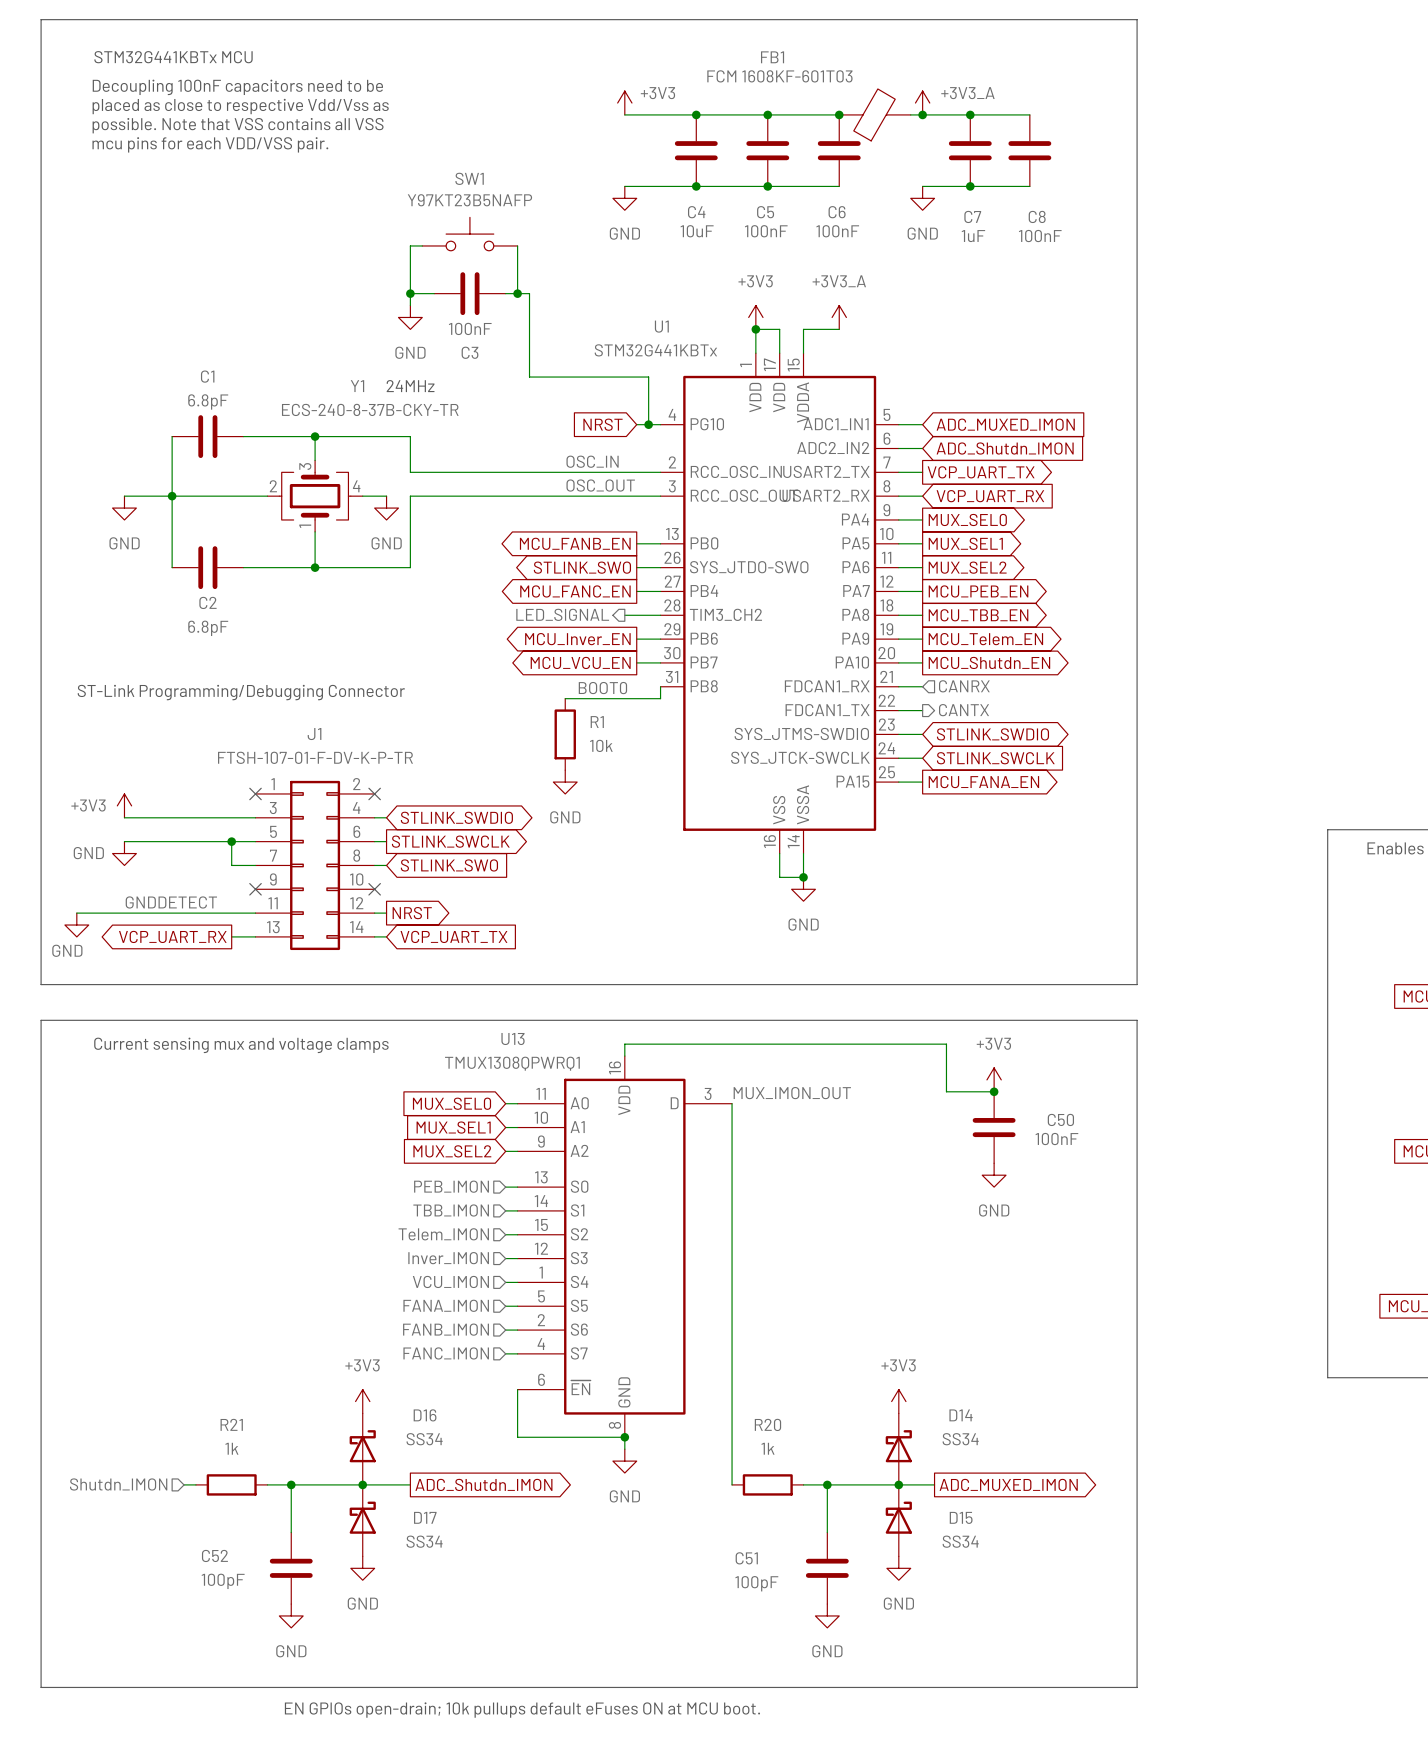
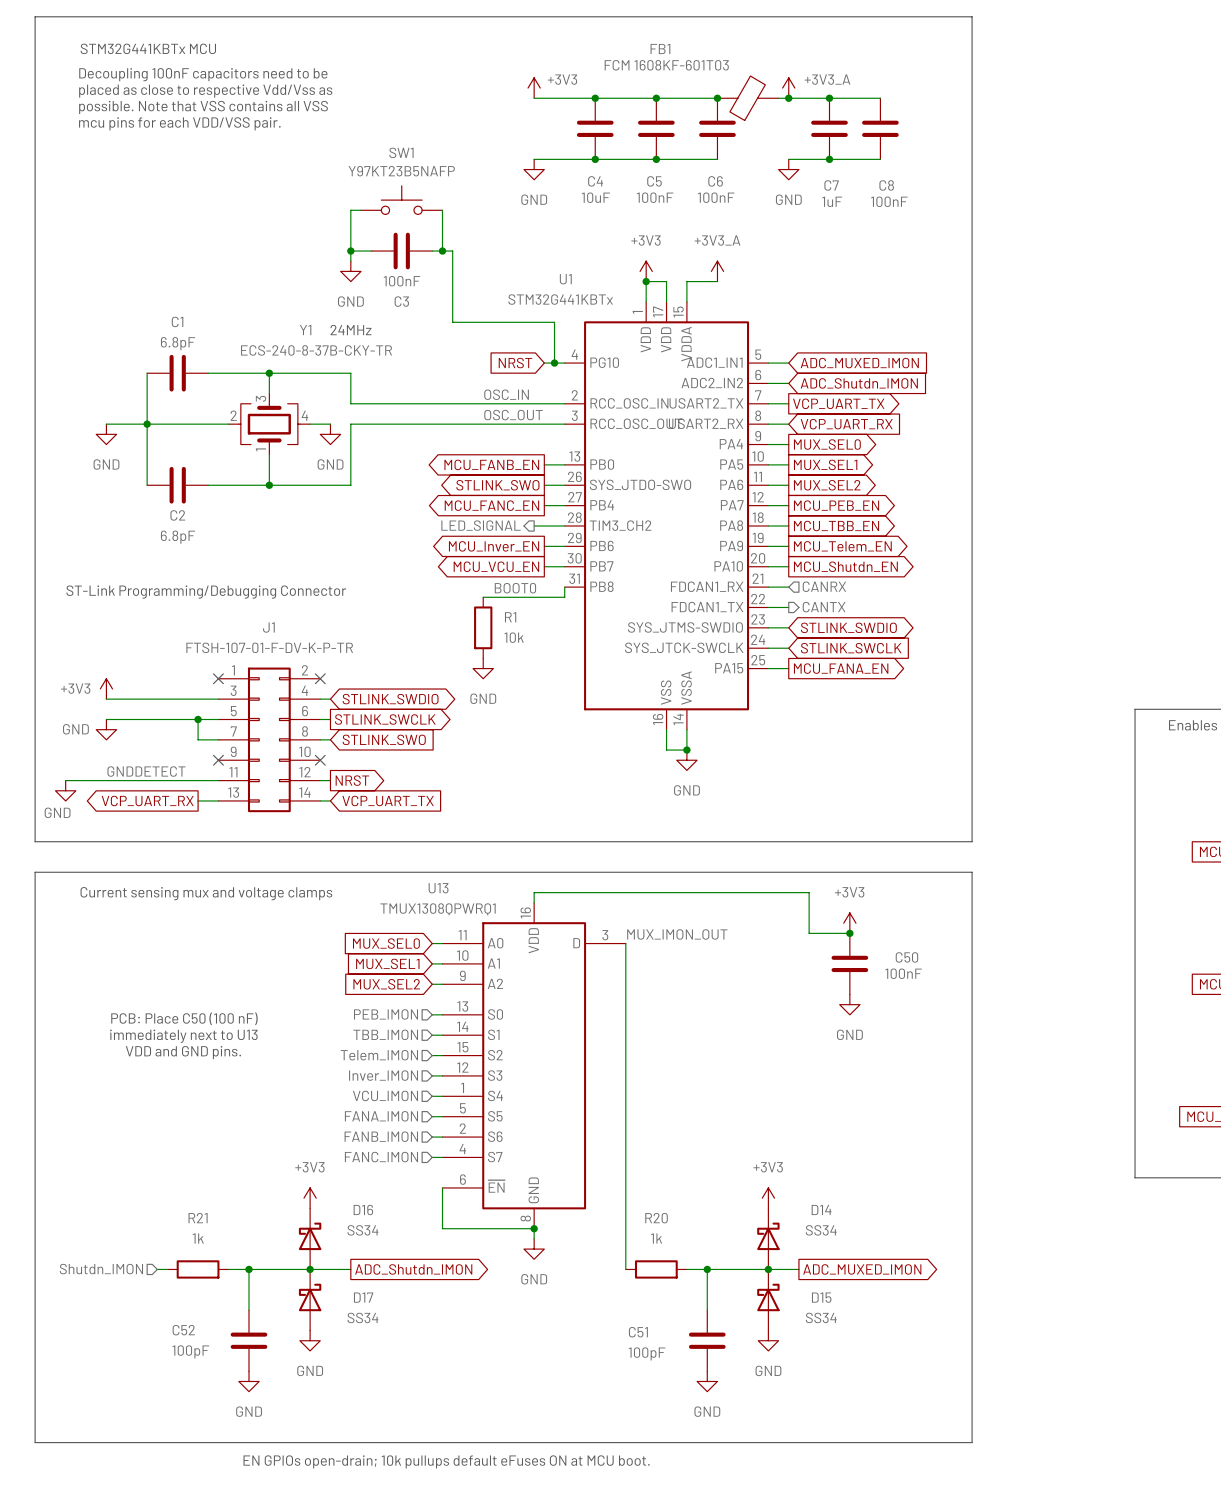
text: none -> PCB: Place C50 (100 nF) (184, 1018)
text: none -> immediately next to U13 (183, 1036)
text: none -> VDD and GND pins. (183, 1052)

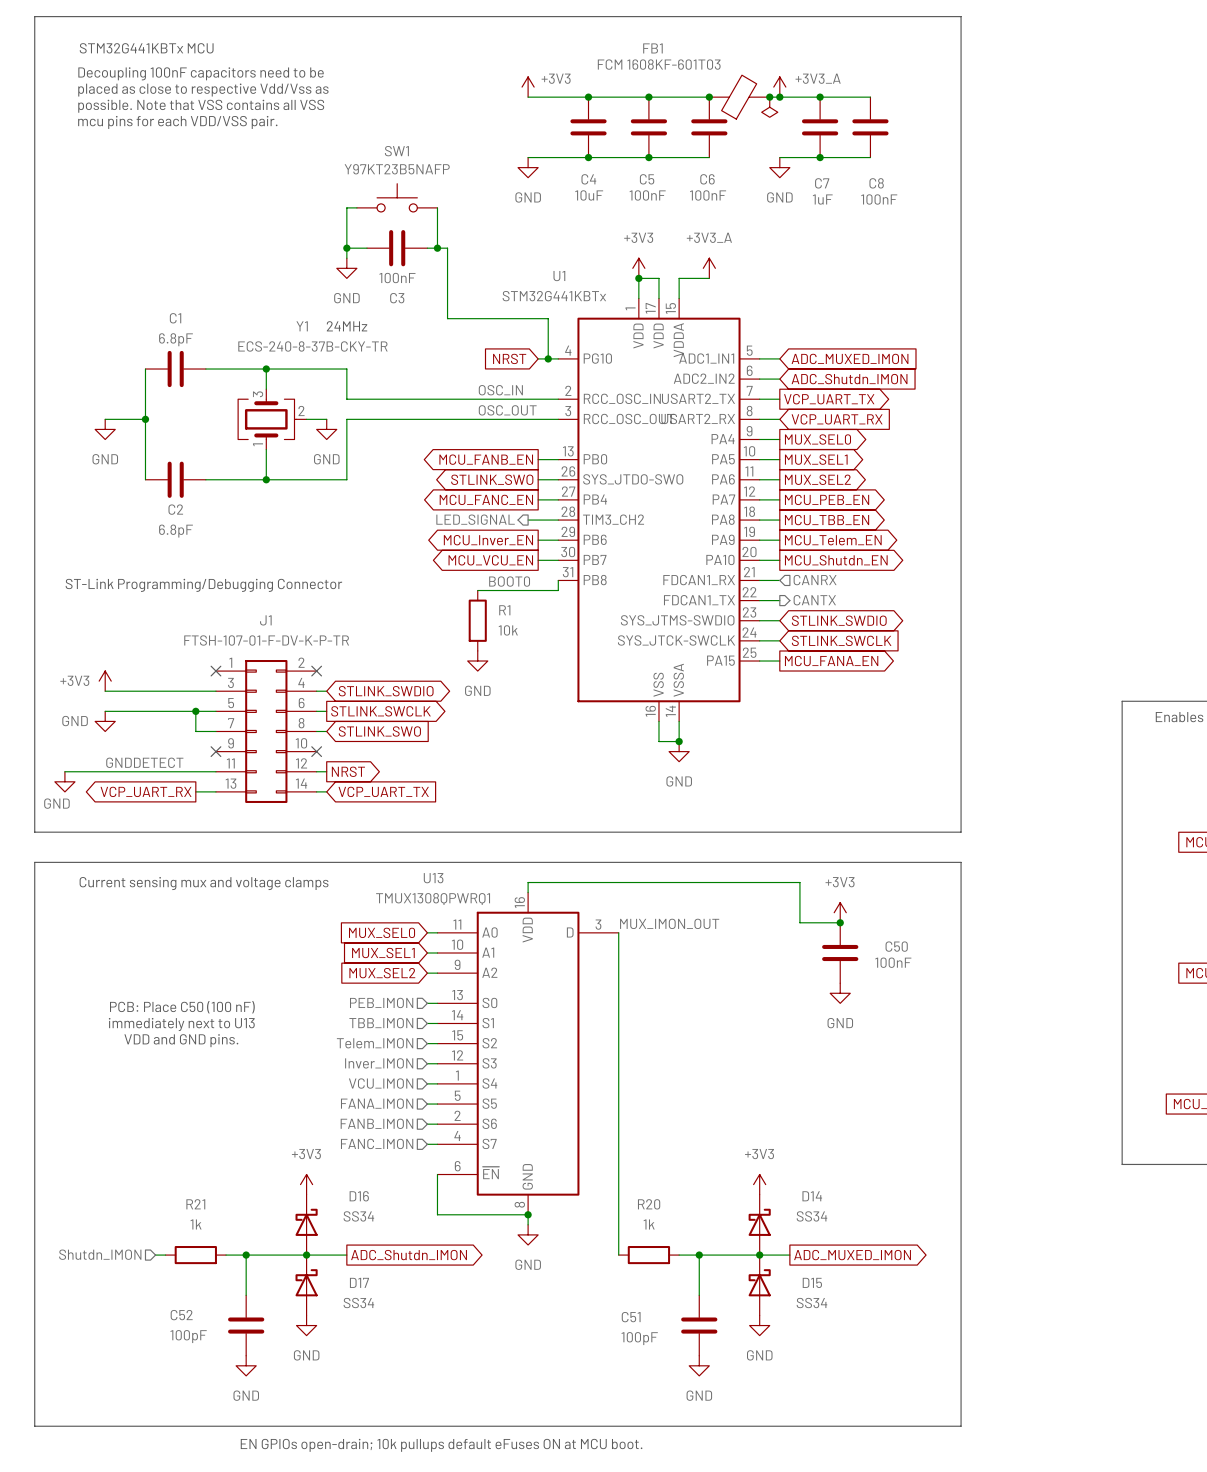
junction: none -> (769, 97)
power symbol: none -> (769, 107)
Y1 symbol: [228, 393, 311, 455] -> [238, 389, 307, 450]
wire: (147, 424) (228, 424) -> none

